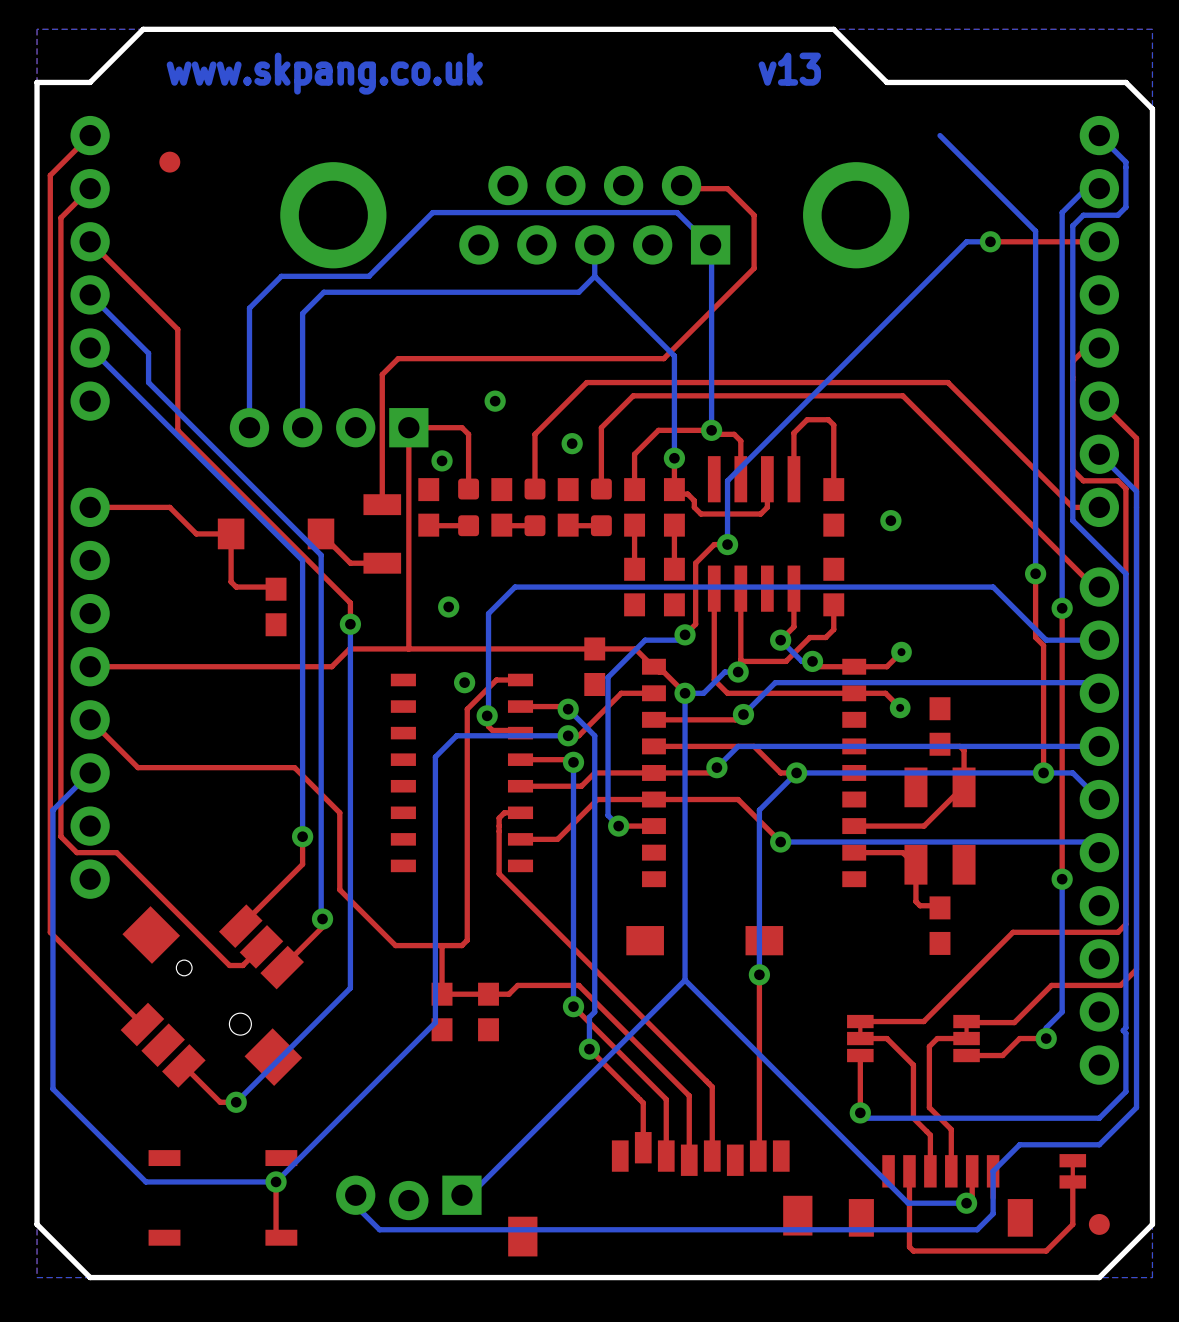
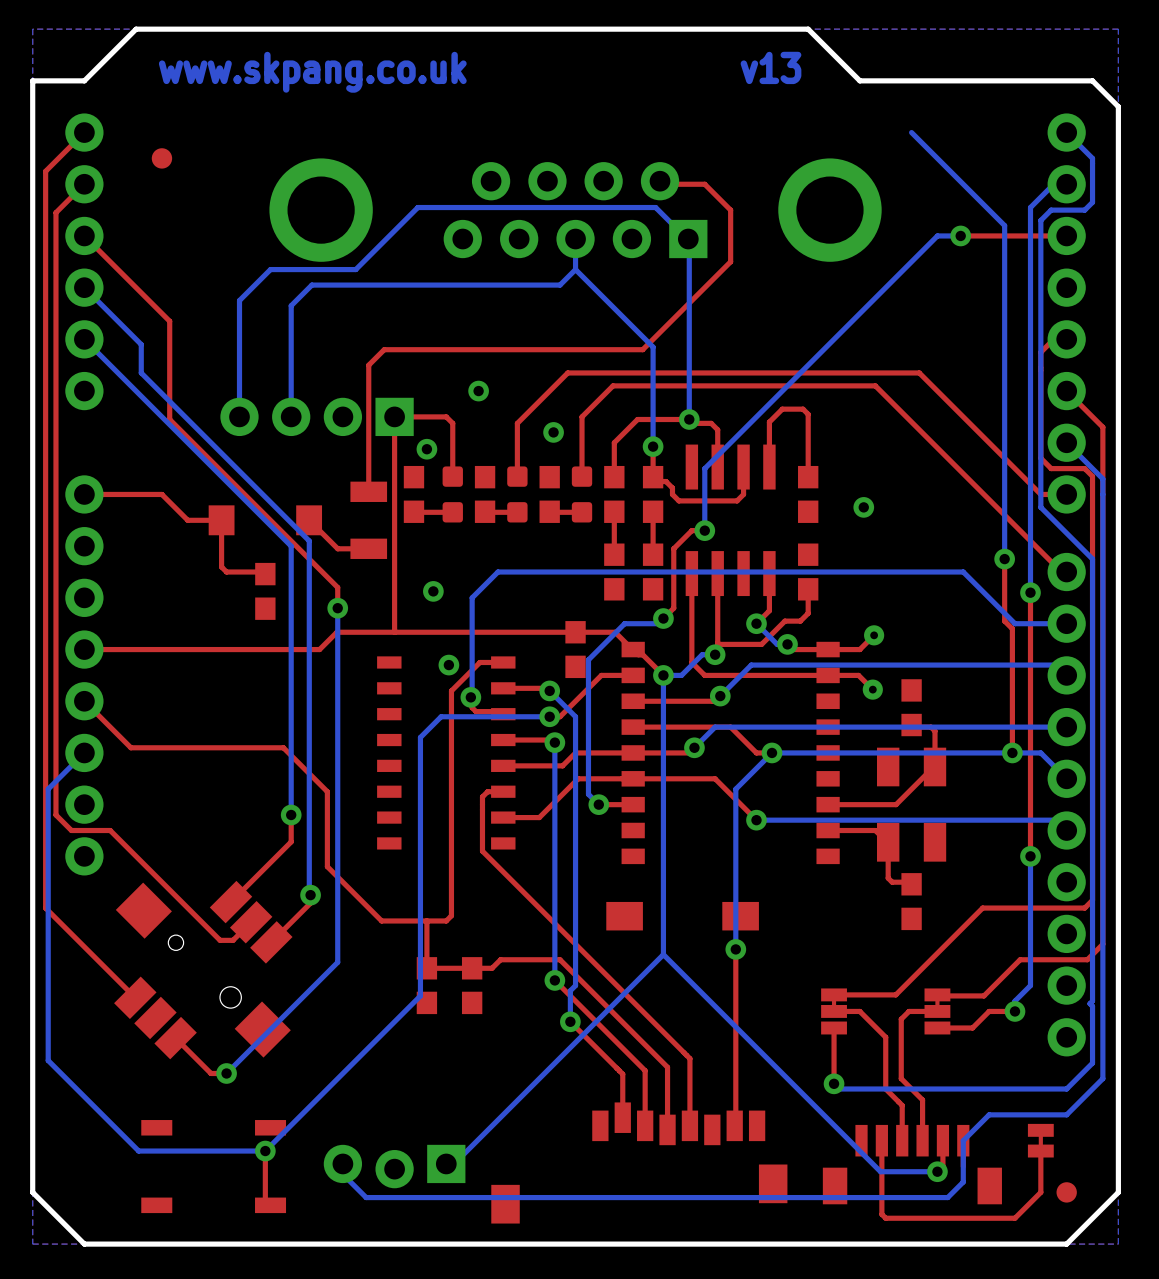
drawing: none -> [740, 51, 802, 85]
text: v13 (789, 69) -> none

